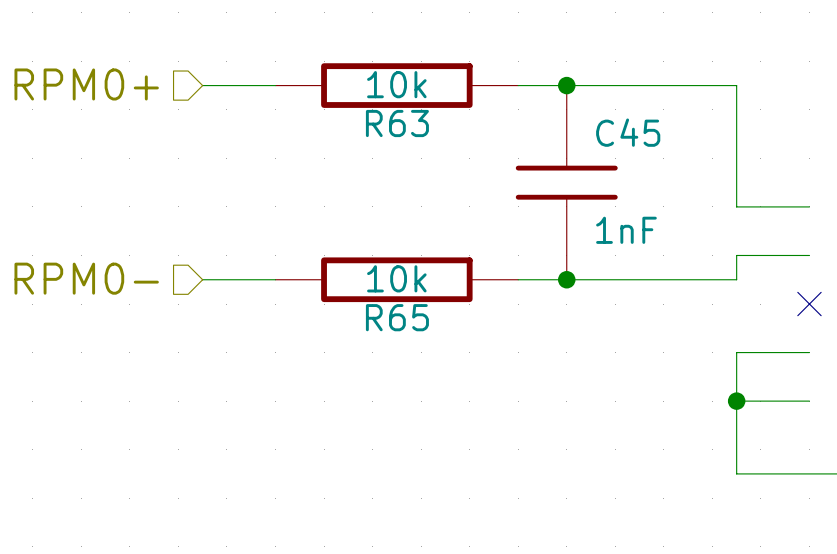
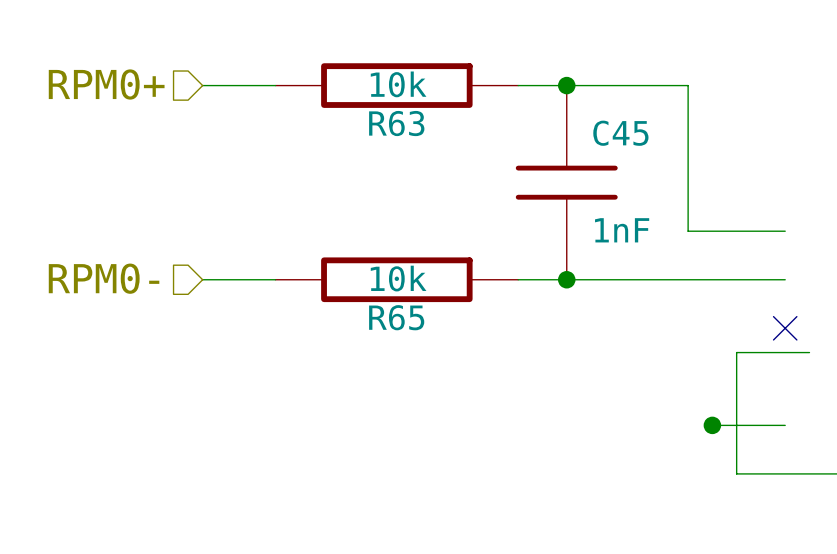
wire: (688, 85) (736, 85) (736, 206) (809, 206) -> (688, 85) (688, 231) (785, 231)
wire: (809, 255) (736, 255) (736, 279) -> (785, 279) (736, 279)
no-connect mark position: (809, 304) -> (785, 328)
wire: (736, 401) (809, 401) -> (712, 425) (785, 425)
junction position: (736, 401) -> (712, 425)

